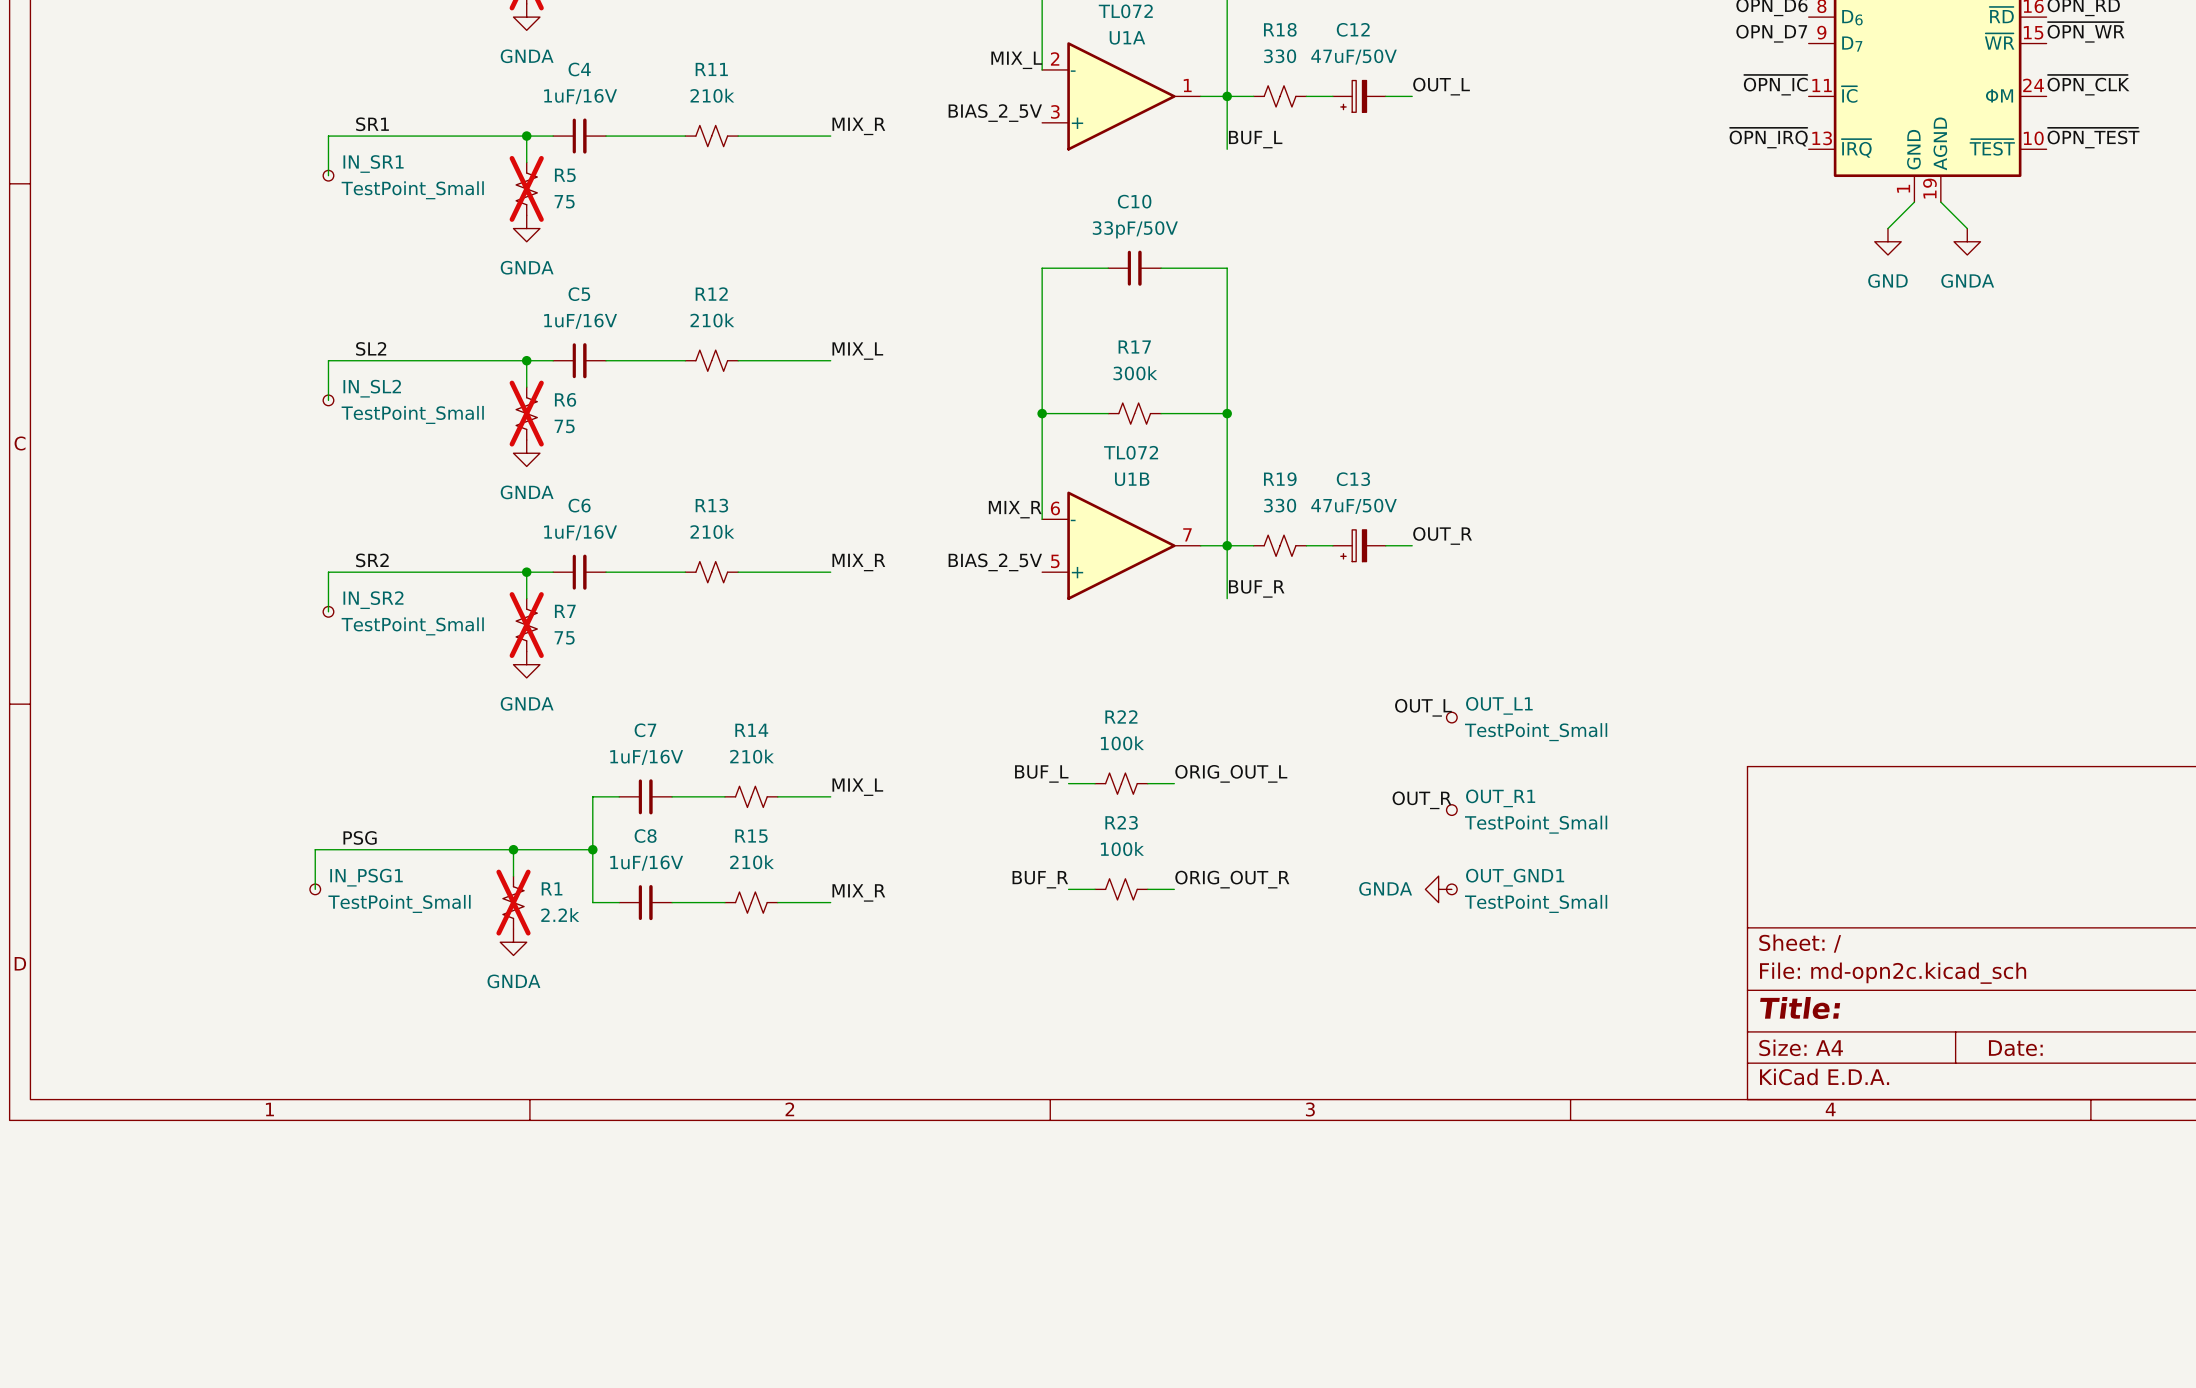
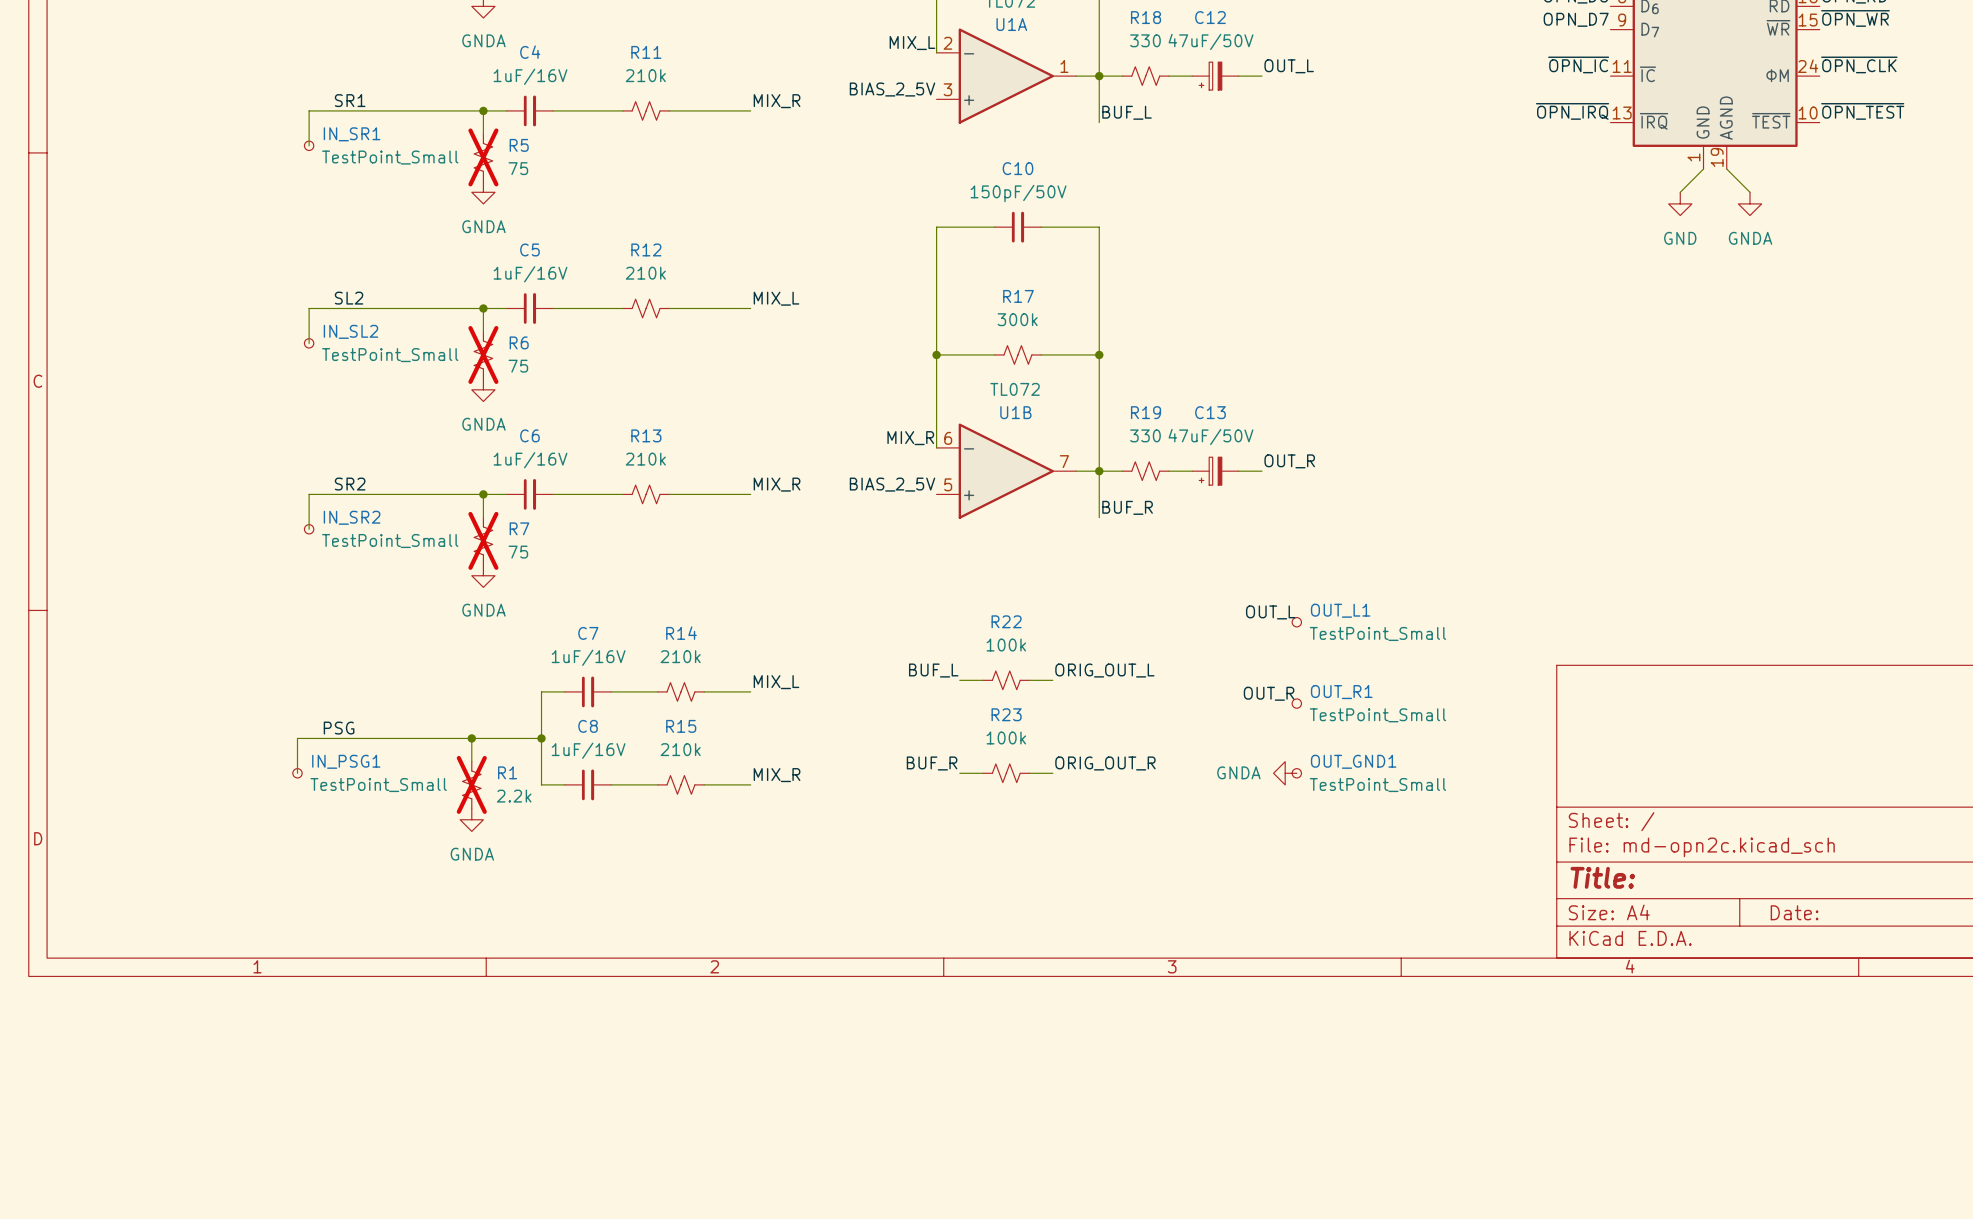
C10 value: 33pF/50V (1135, 229) -> 150pF/50V (1018, 193)

